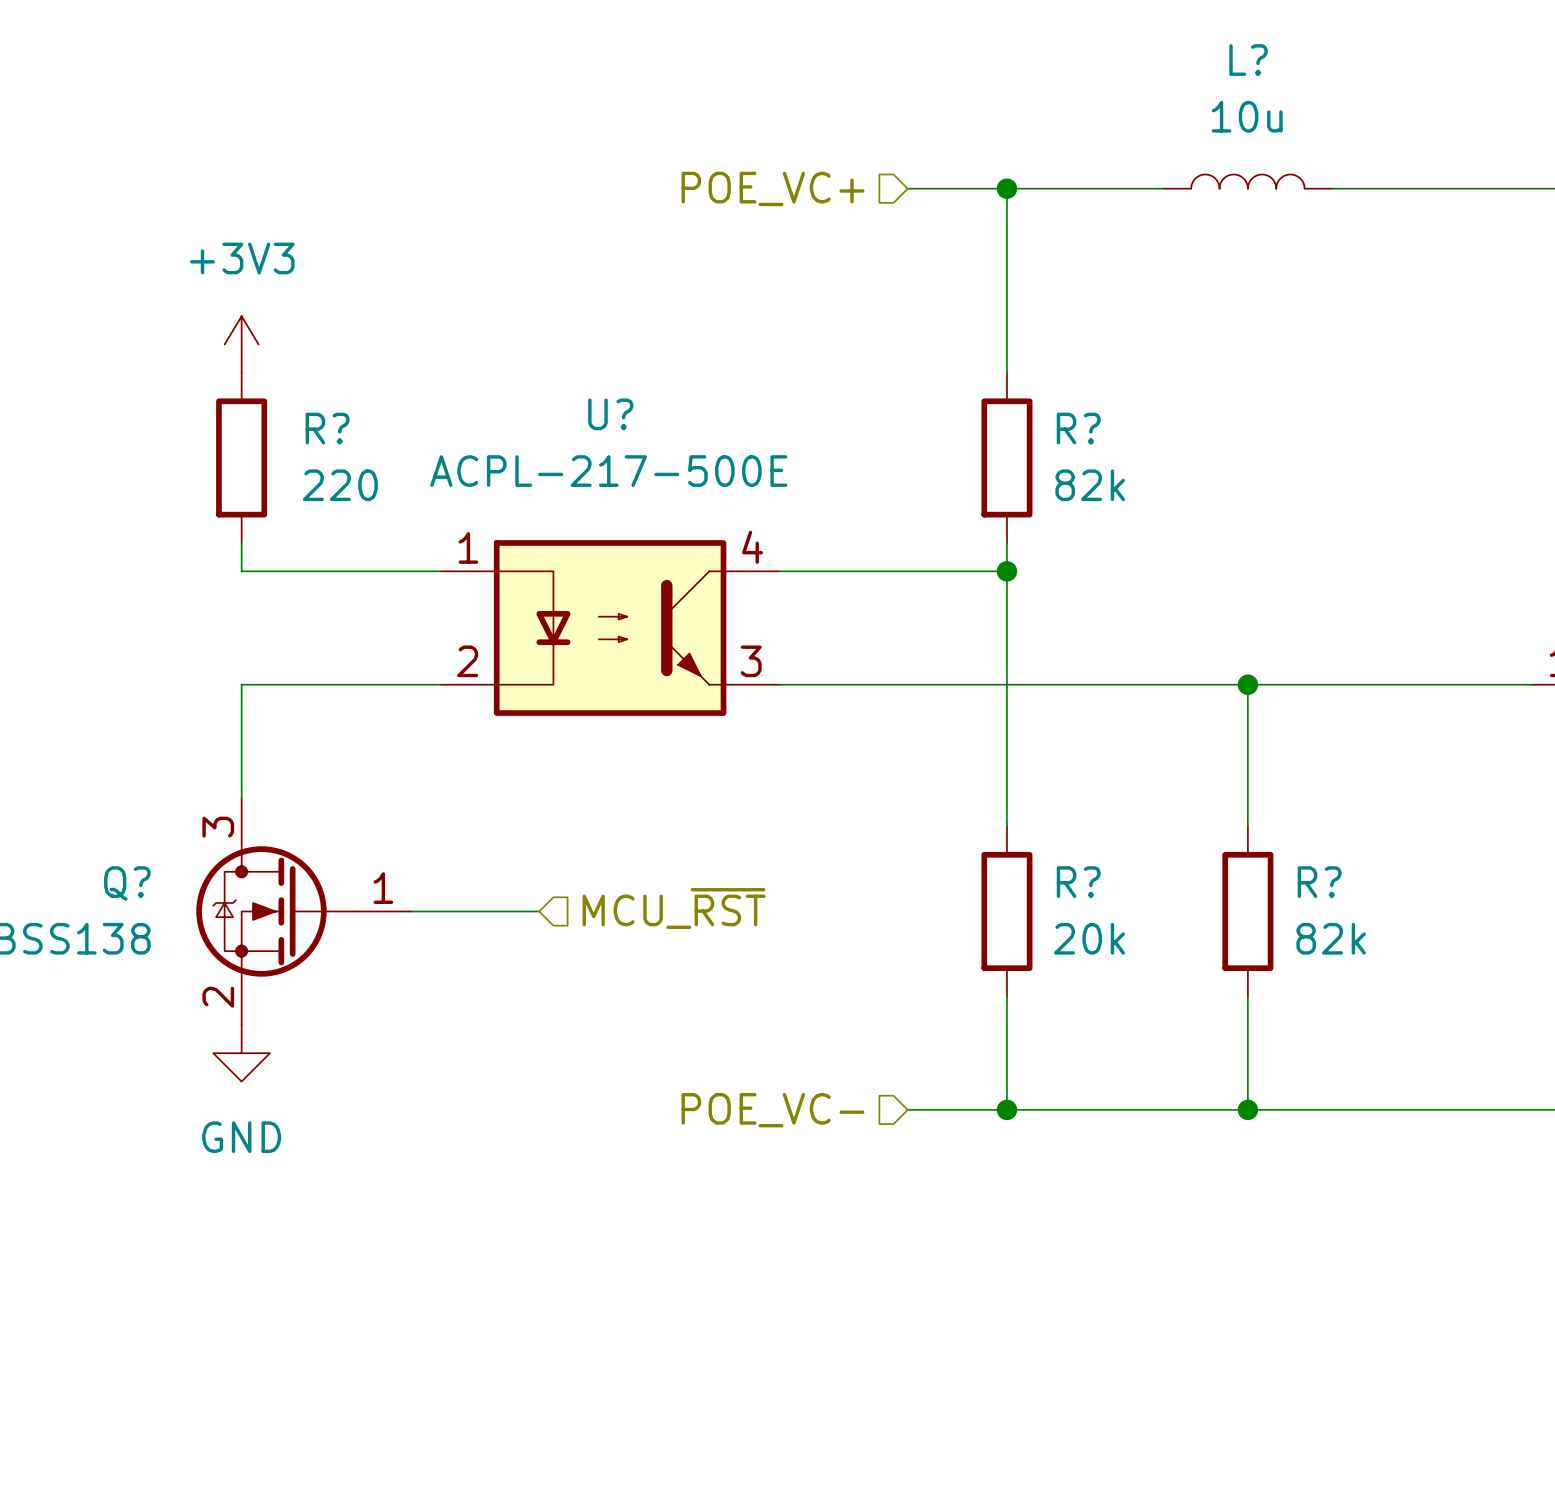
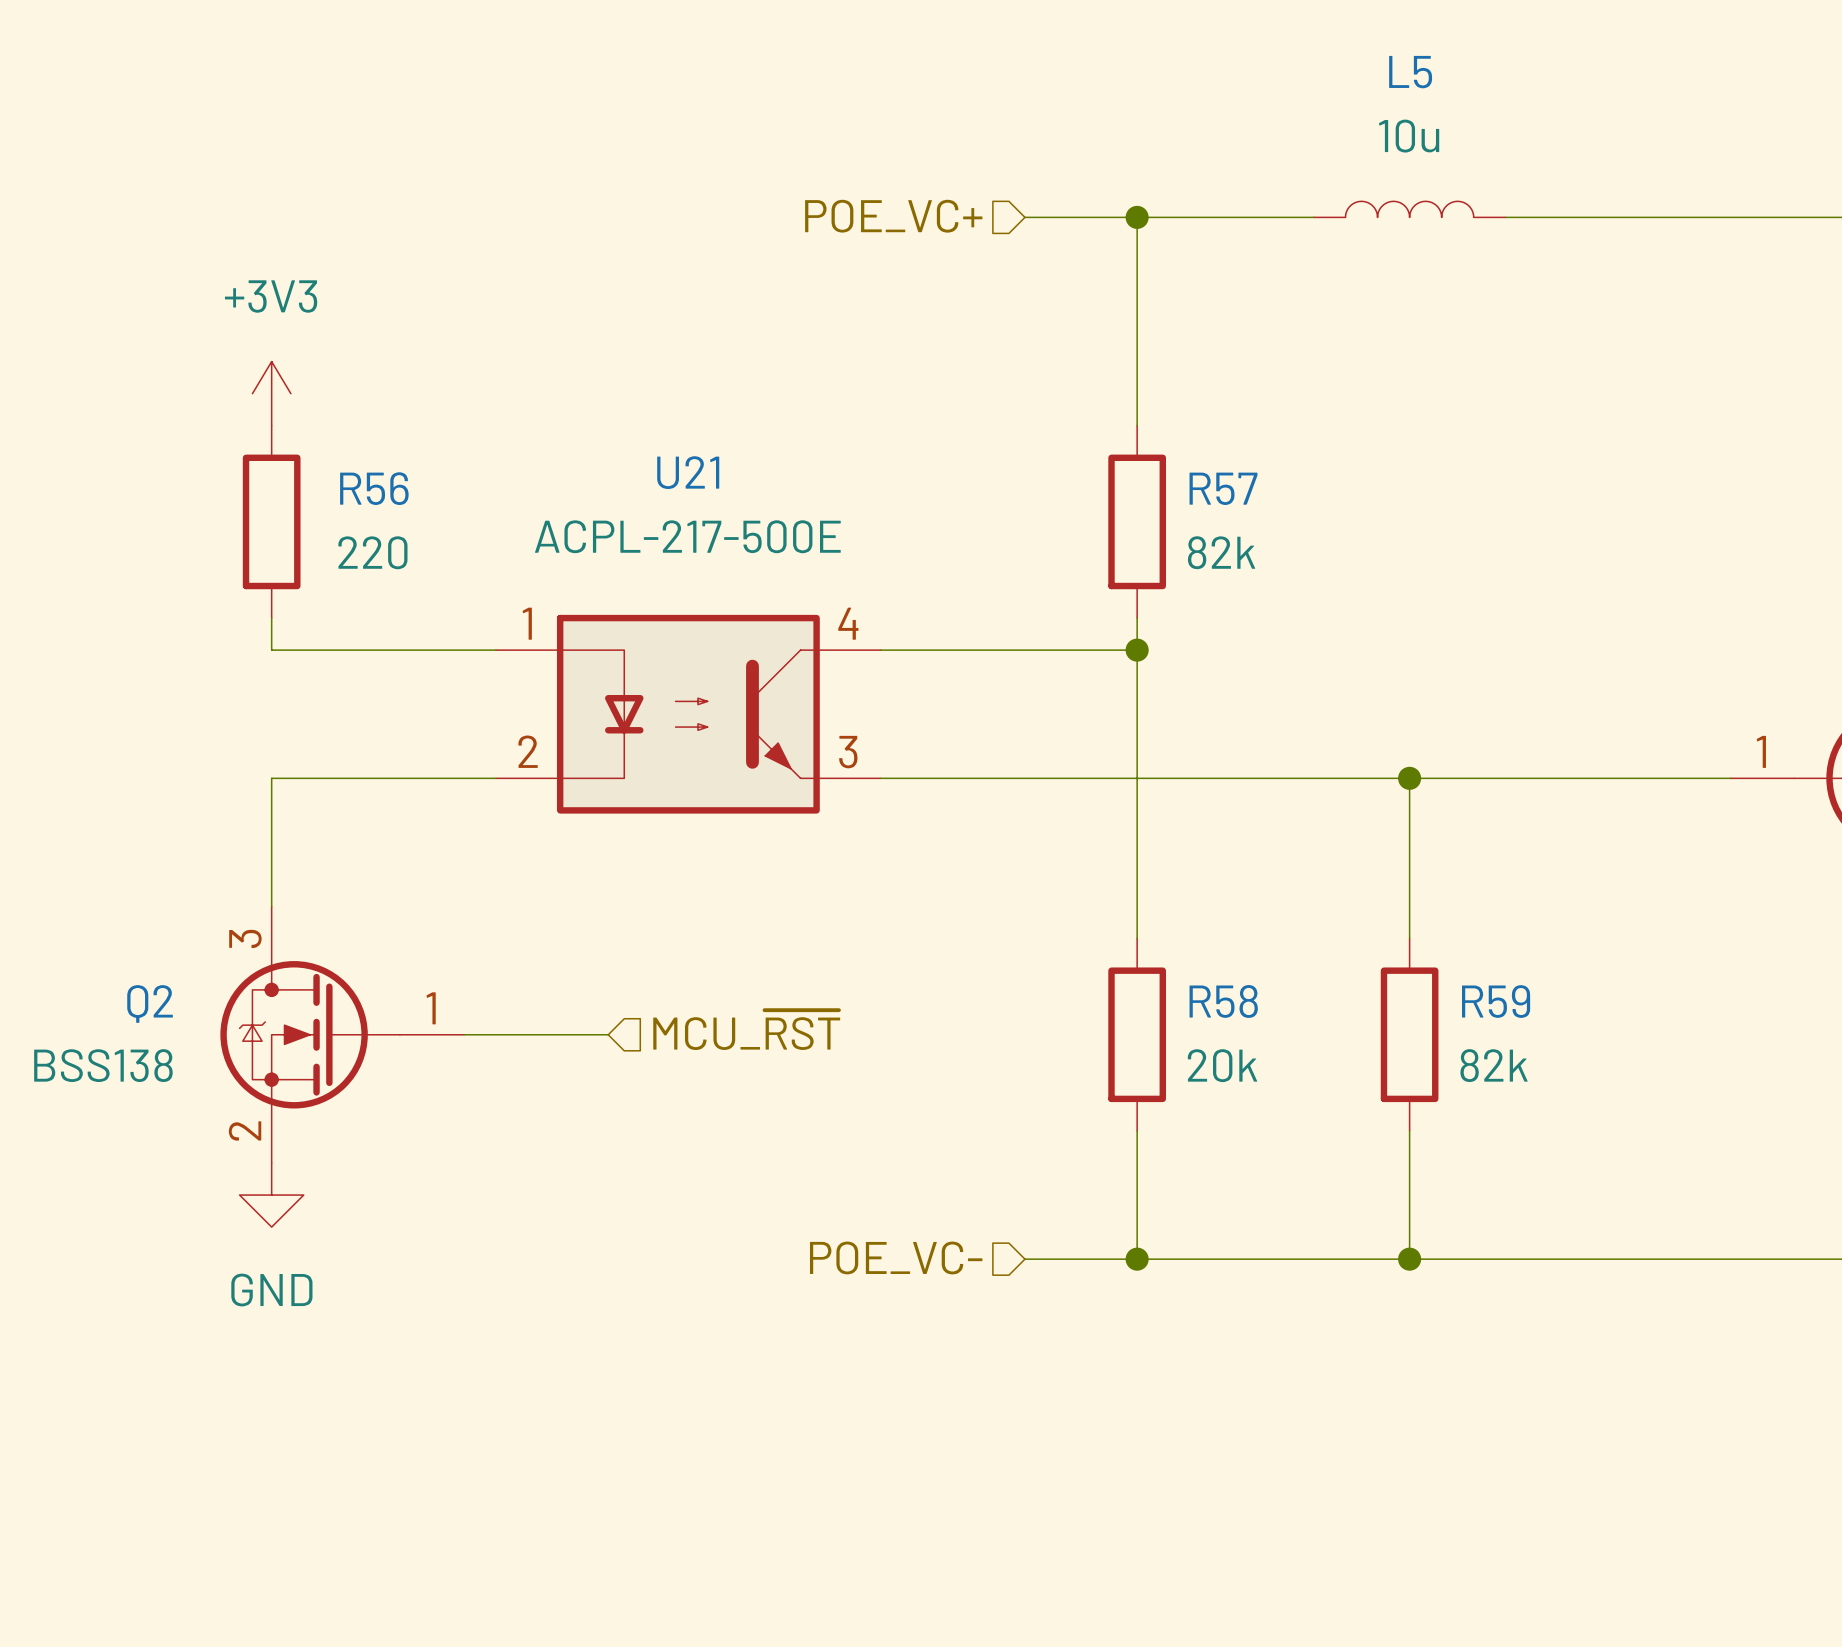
L? name: L? (1248, 60) -> L5 (1410, 72)
U? name: U? (610, 414) -> U21 (688, 472)
R? name: R? (327, 428) -> R56 (374, 488)
R? name: R? (1078, 428) -> R57 (1223, 488)
R? name: R? (1078, 882) -> R58 (1223, 1001)
R? name: R? (1319, 882) -> R59 (1496, 1001)
Q? name: Q? (127, 883) -> Q2 (150, 1003)

